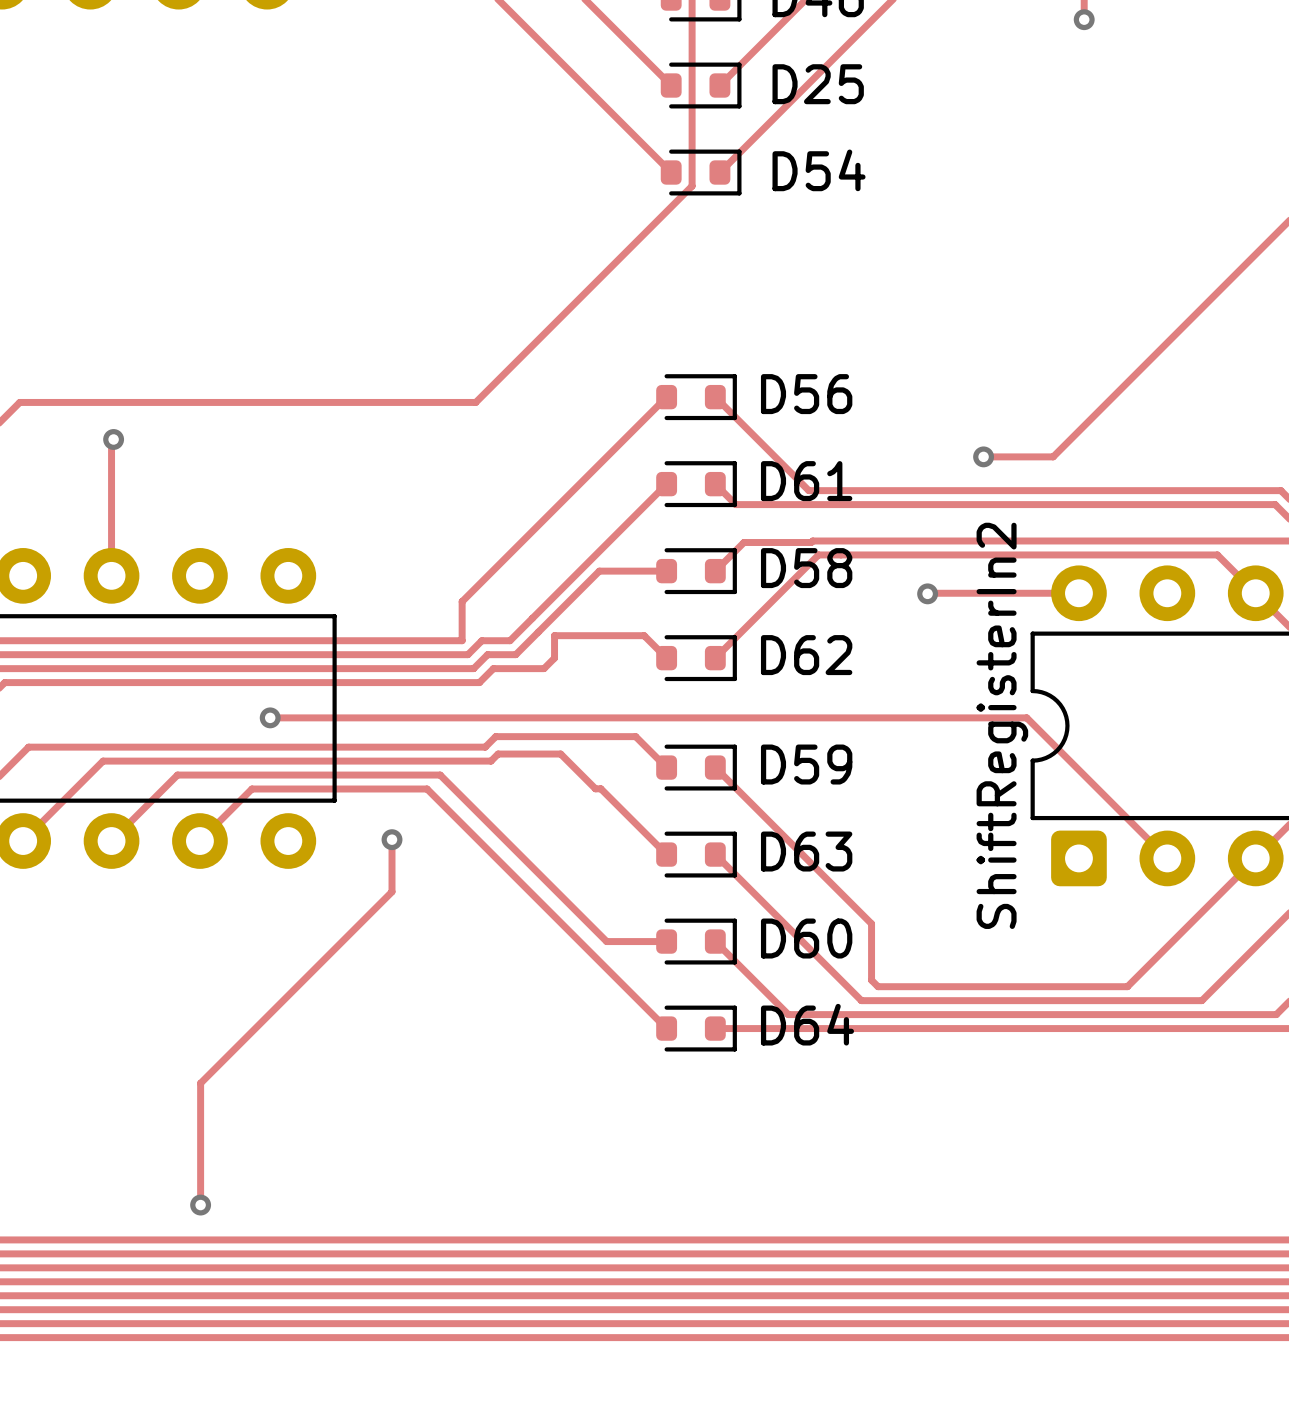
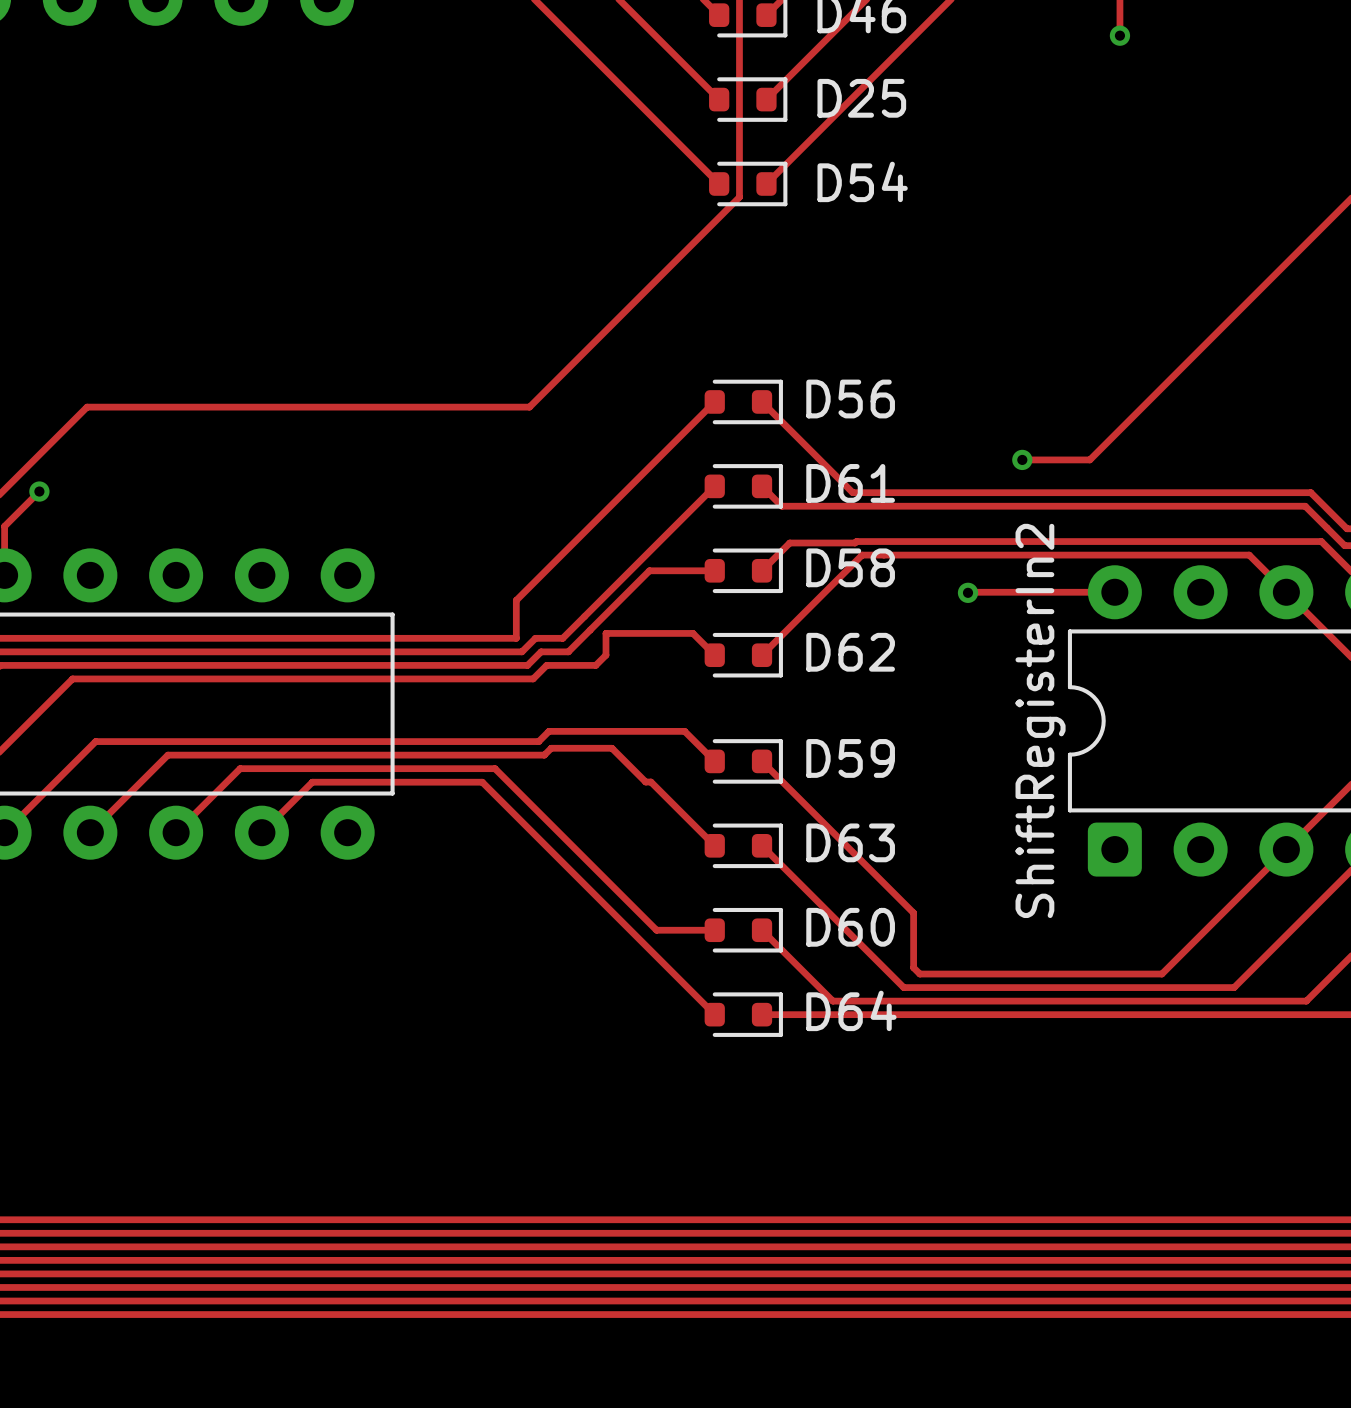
track: (113, 439) (111, 441) (111, 575) -> none
via: (113, 439) -> none
track: (270, 717) (1026, 717) (1167, 858) -> none
via: (270, 717) -> none
track: (392, 839) (392, 891) (200, 1083) (200, 1205) -> none
via: (392, 839) -> none
via: (200, 1205) -> none

